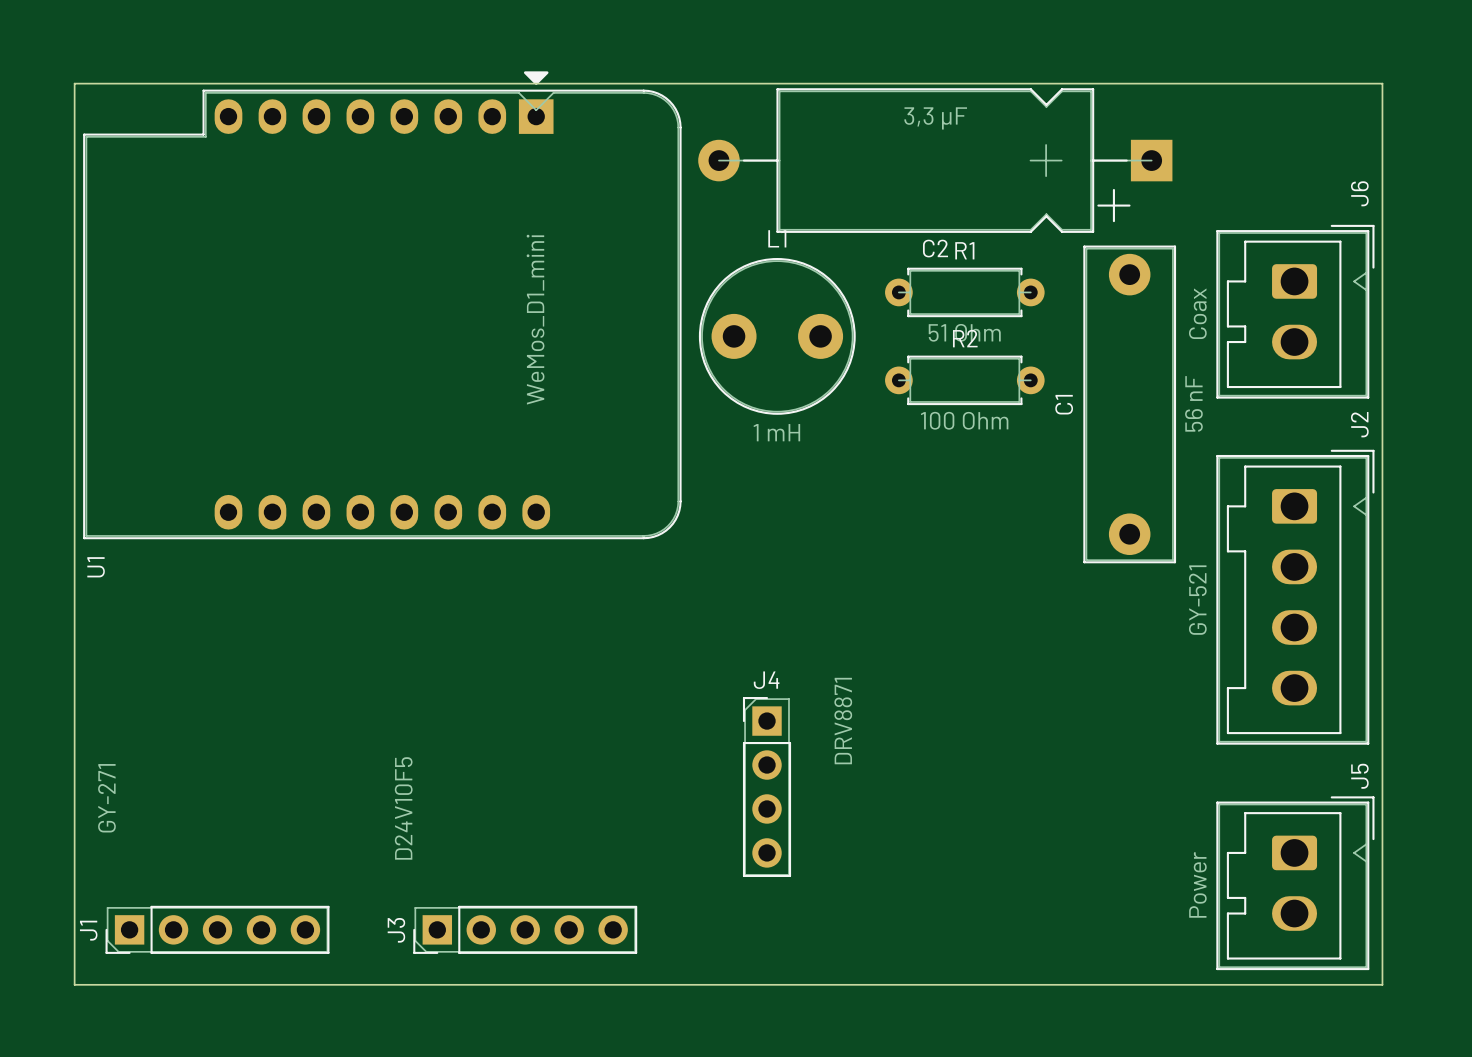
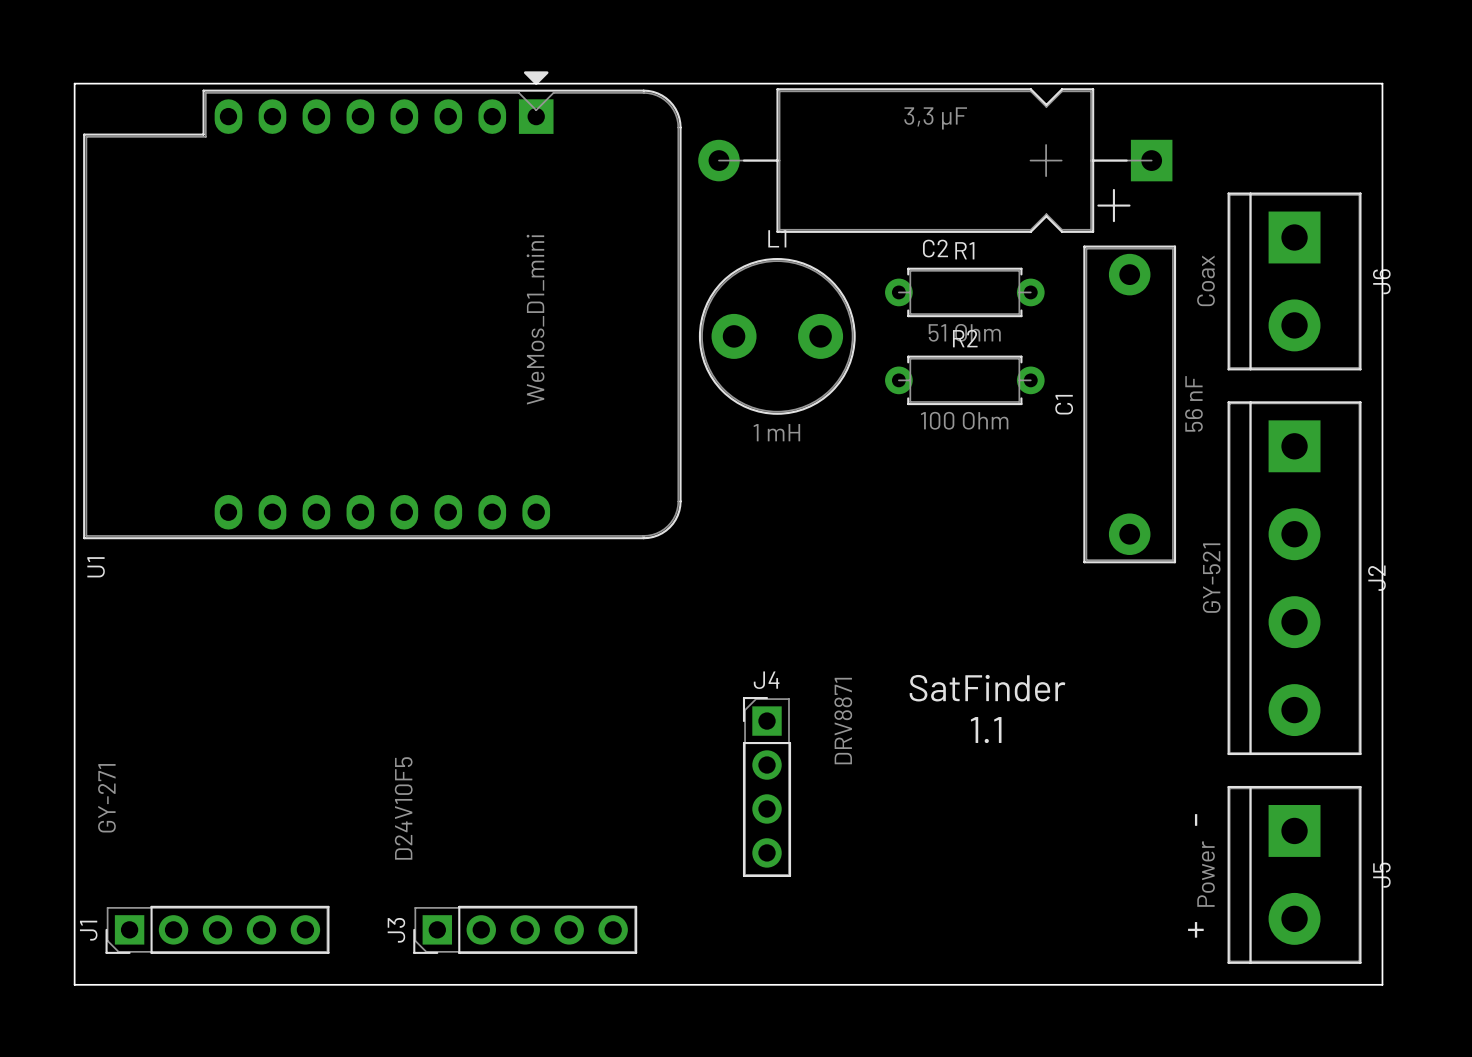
J6 name position: J6 (1359, 193) -> J6 (1381, 281)
J6 footprint: [1216, 224, 1375, 399] -> [1227, 192, 1362, 371]
J2 name position: J2 (1359, 424) -> J2 (1376, 578)
J2 footprint: [1216, 449, 1375, 745] -> [1227, 401, 1362, 756]
text: none -> SatFinder (987, 688)
text: none -> 1.1 (986, 730)
J5 name position: J5 (1359, 776) -> J5 (1381, 875)
J5 footprint: [1216, 796, 1375, 971] -> [1227, 785, 1362, 964]
text: none -> - (1196, 819)
text: none -> + (1195, 929)

